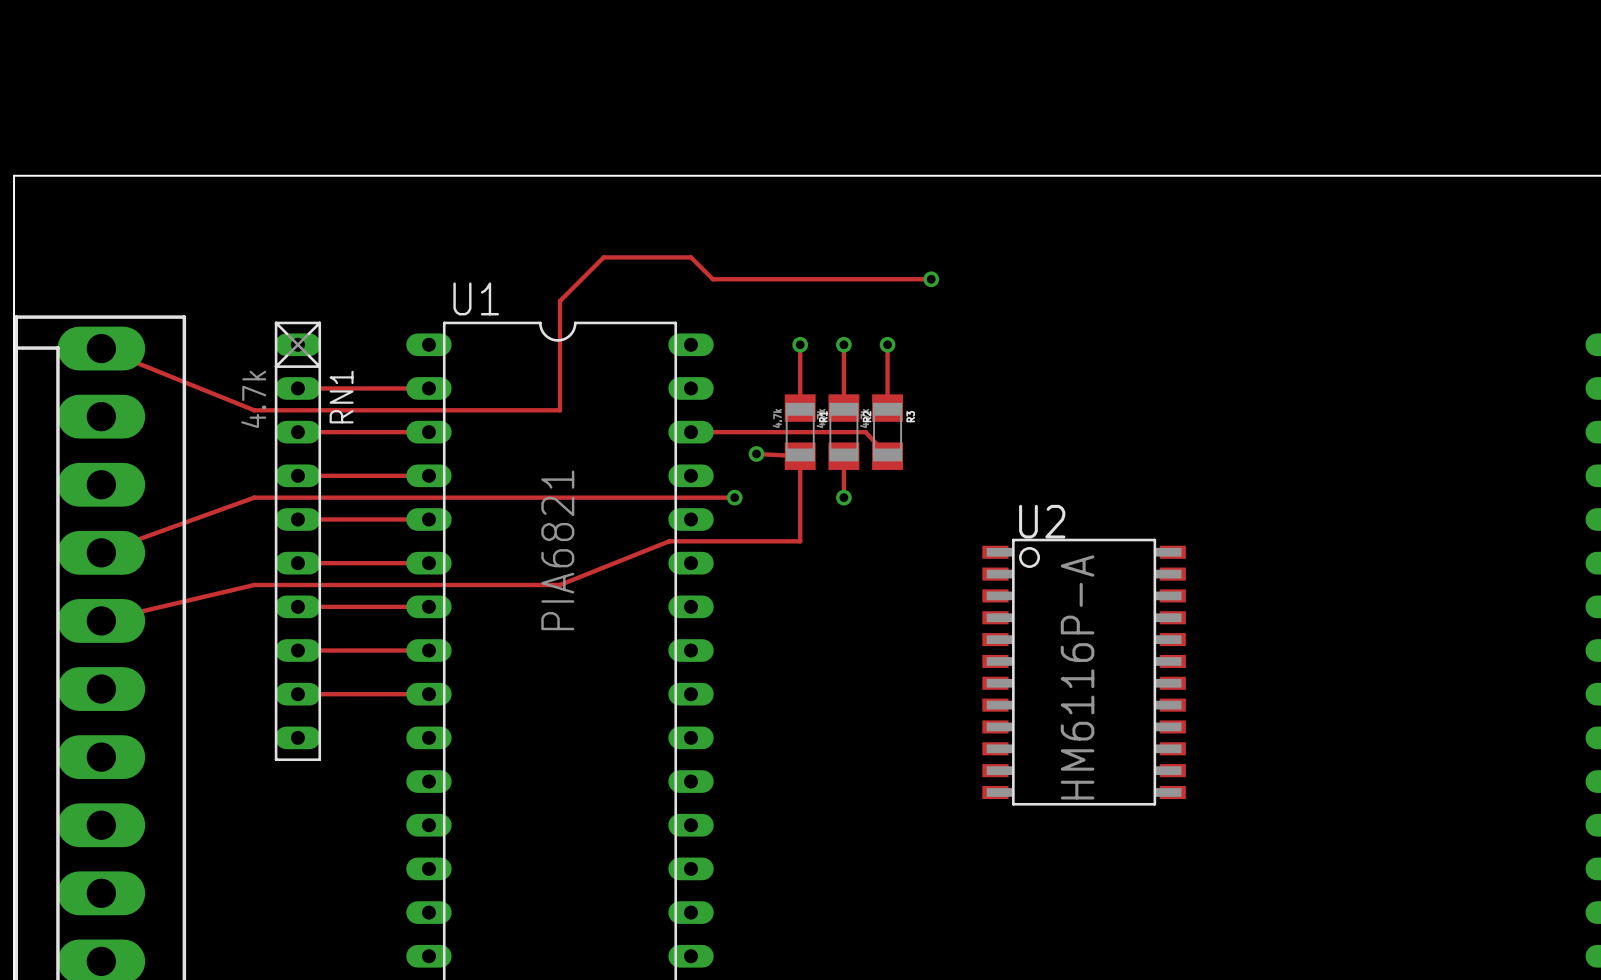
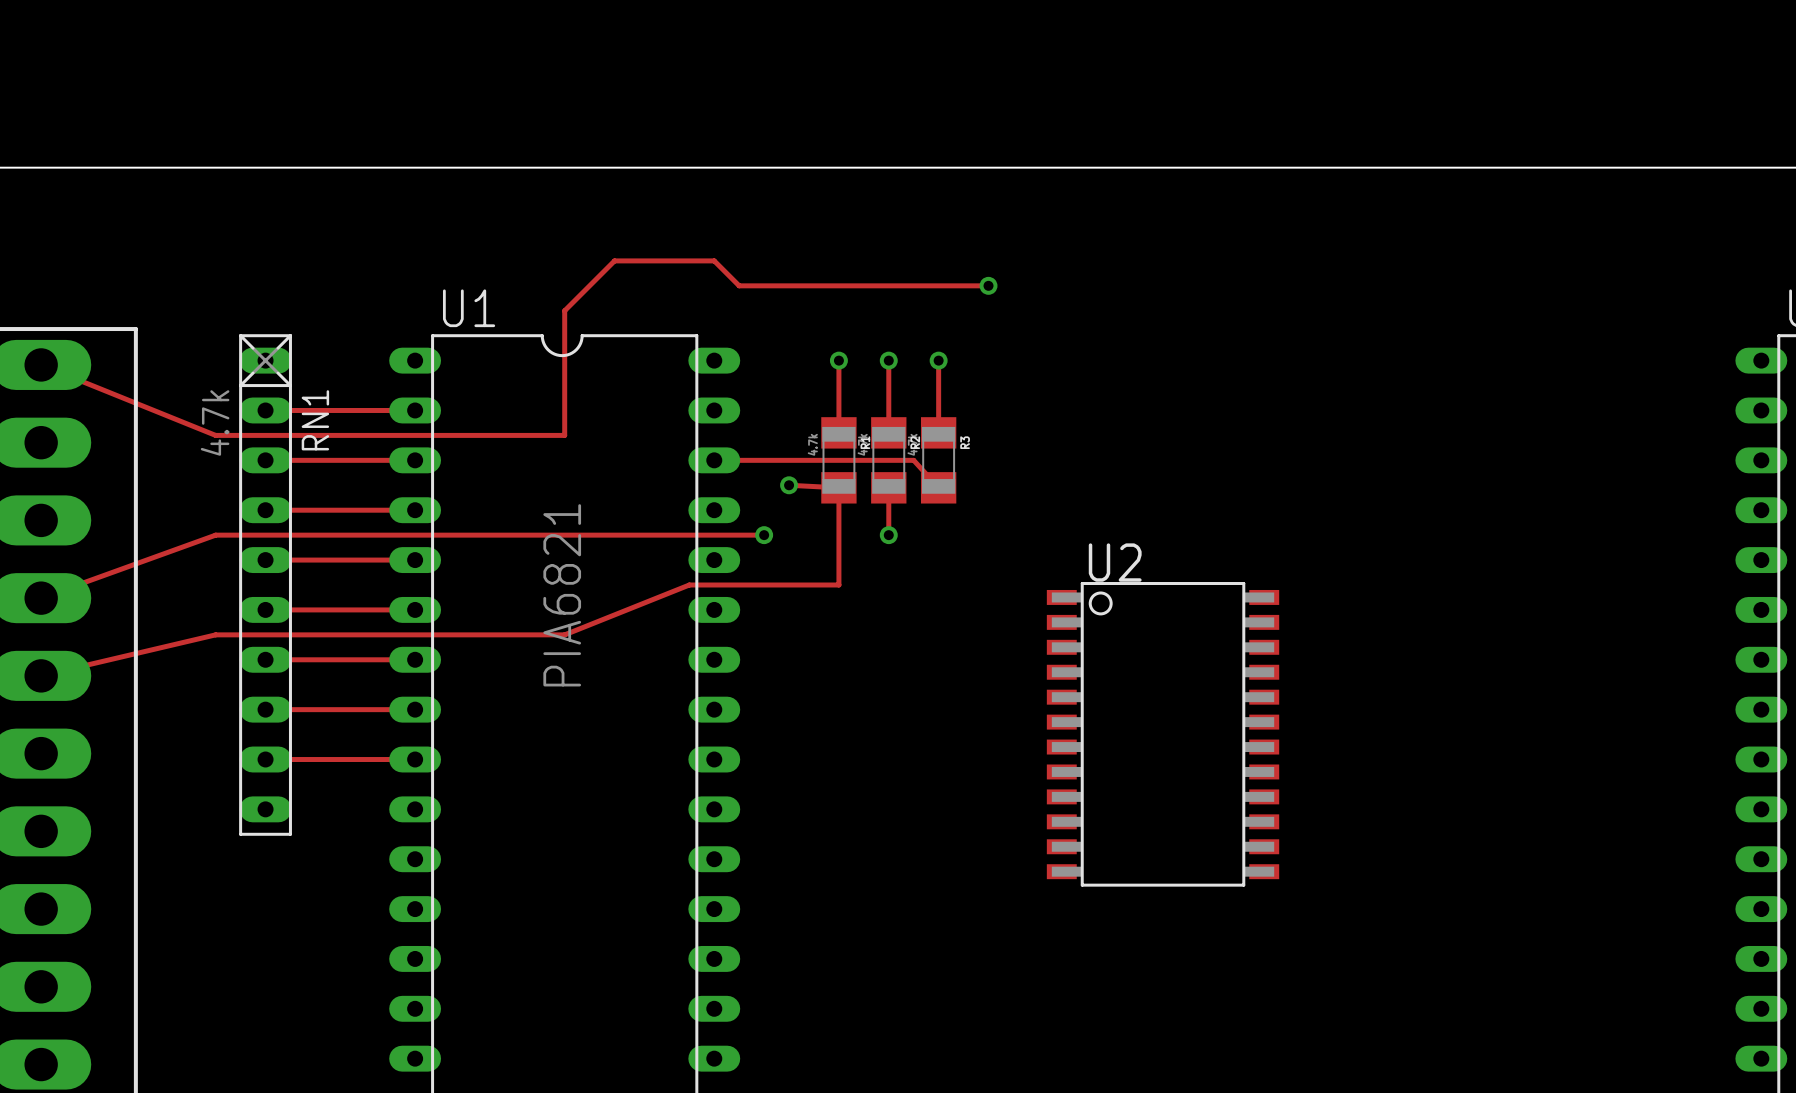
U2 value: HM6116P-A (1077, 677) -> none

